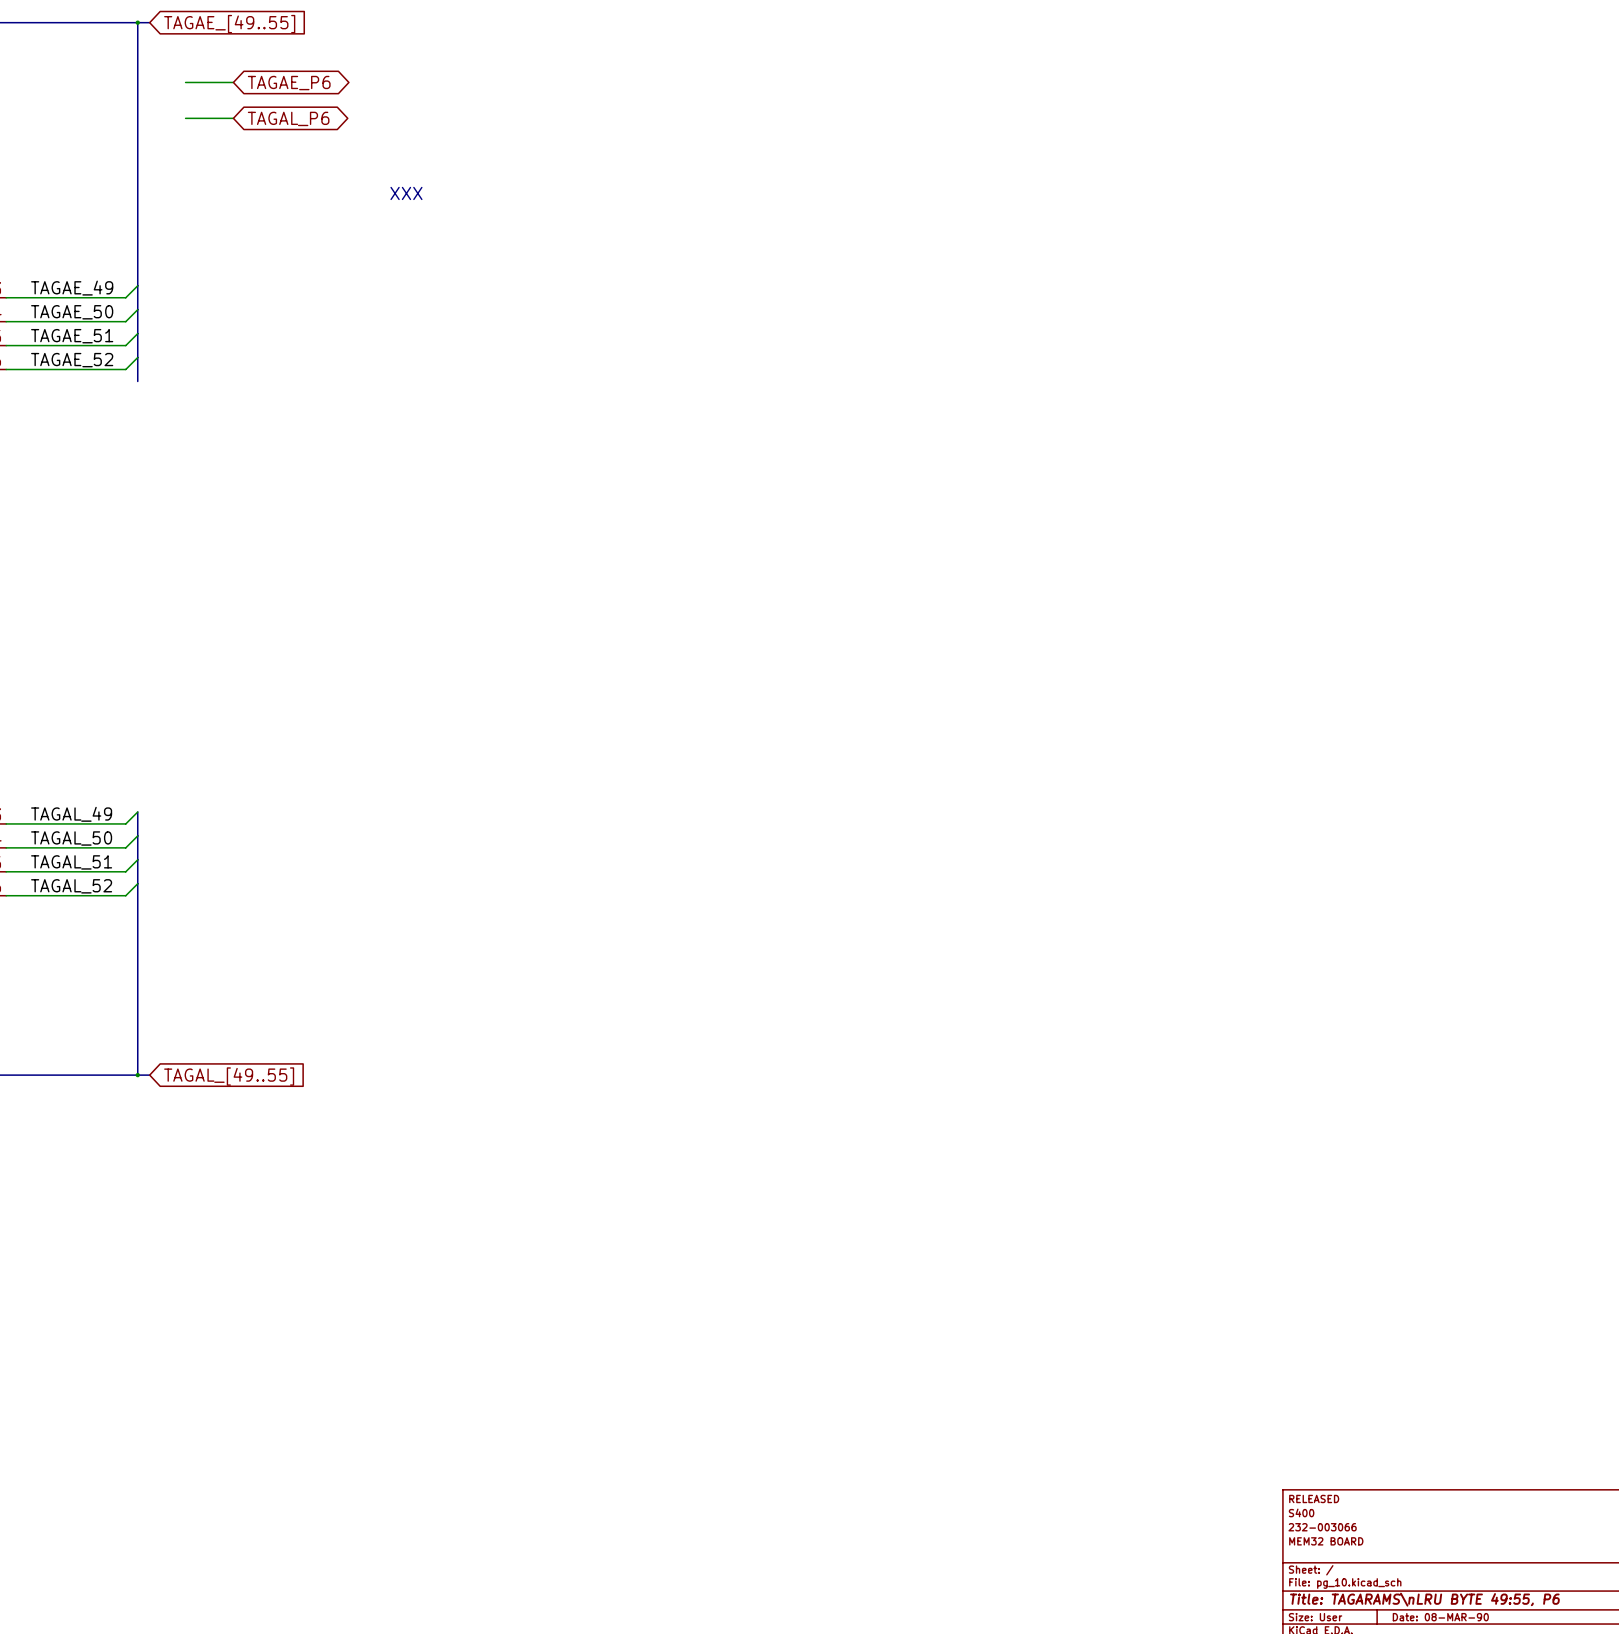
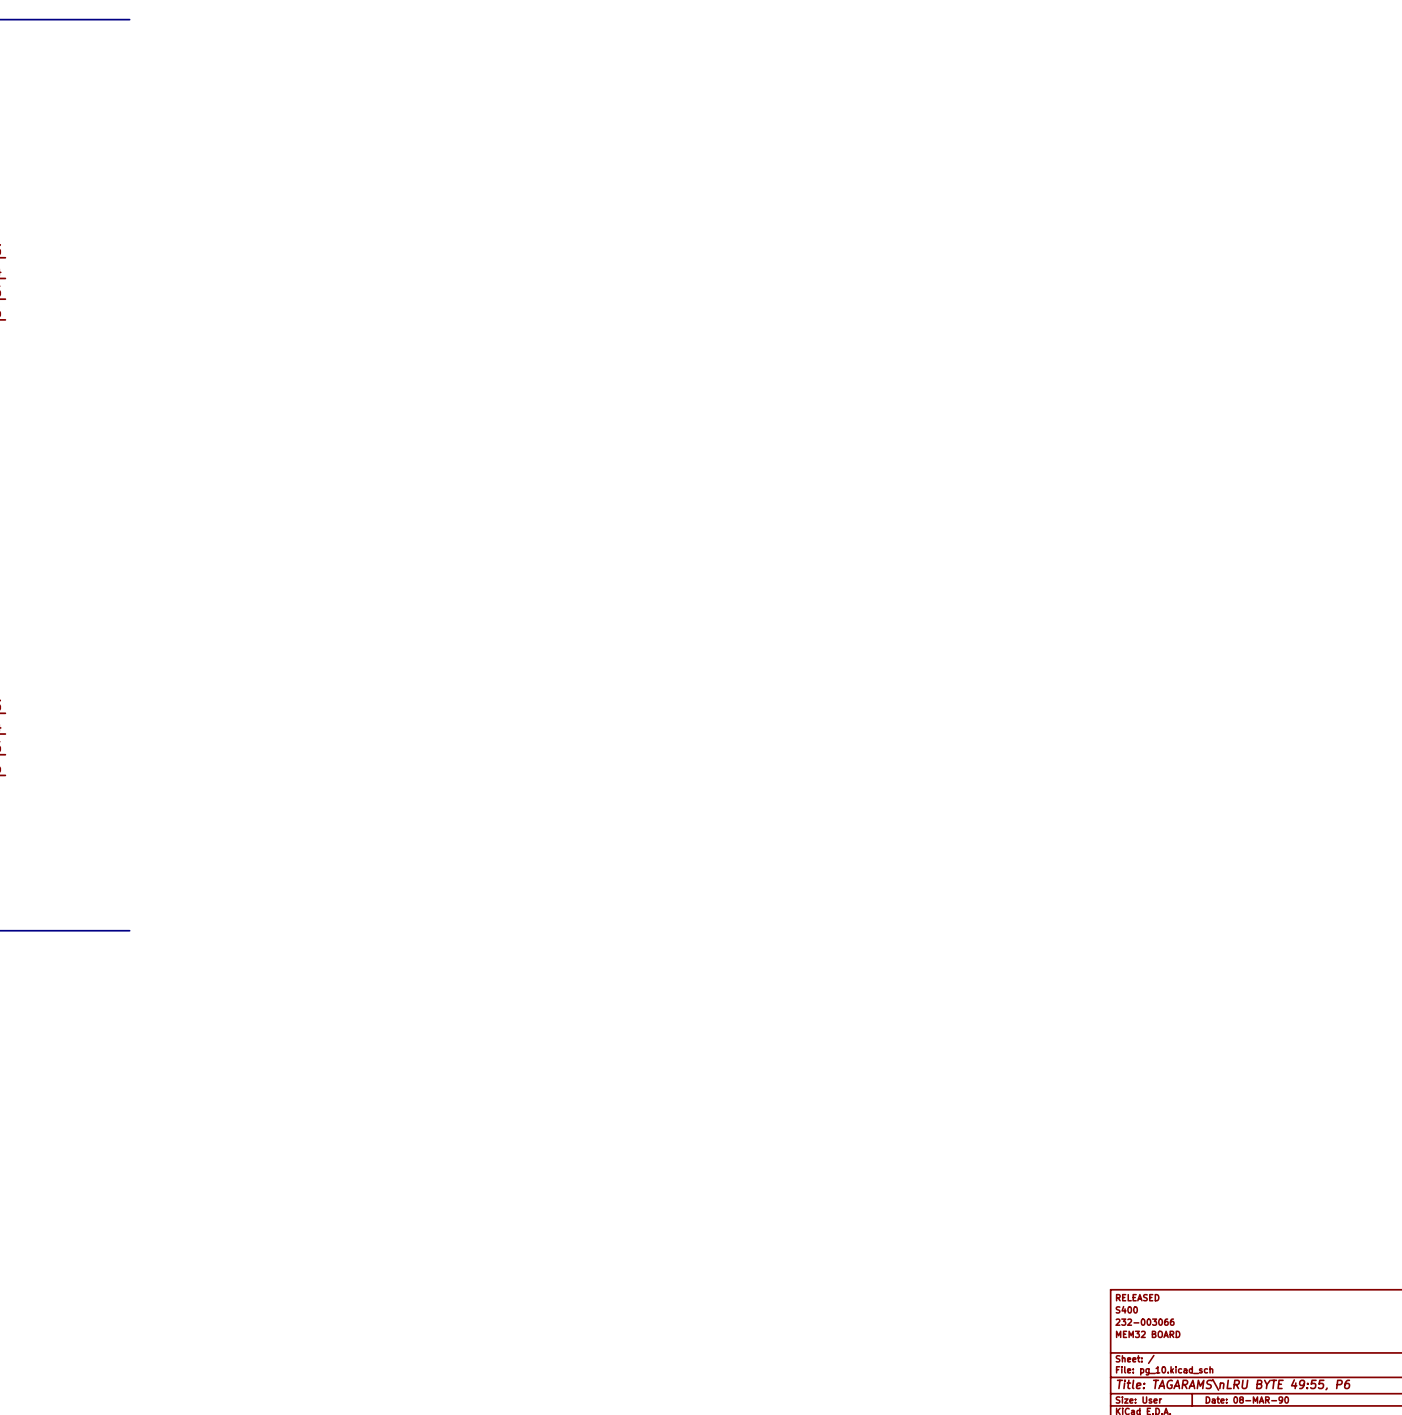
bus: (137, 22) (137, 381) -> none
junction: (137, 22) -> none
global label: TAGAE_[49..55] (229, 24) -> none
wire: (185, 82) (233, 82) -> none
global label: TAGAE_P6 (289, 83) -> none
wire: (185, 118) (233, 118) -> none
global label: TAGAL_P6 (288, 118) -> none
text: XXX (406, 193) -> none
wire: (137, 285) (125, 297) (6, 297) -> none
label: TAGAE_49 (72, 288) -> none
wire: (137, 309) (125, 321) (6, 321) -> none
label: TAGAE_50 (72, 312) -> none
wire: (137, 333) (125, 345) (6, 345) -> none
label: TAGAE_51 (72, 336) -> none
wire: (137, 357) (125, 369) (6, 369) -> none
label: TAGAE_52 (72, 360) -> none
bus: (137, 812) (137, 1075) -> none
wire: (137, 812) (125, 823) (6, 823) -> none
label: TAGAL_49 (71, 814) -> none
wire: (137, 835) (125, 847) (6, 847) -> none
label: TAGAL_50 (71, 838) -> none
wire: (137, 859) (125, 871) (6, 871) -> none
label: TAGAL_51 (71, 862) -> none
wire: (137, 883) (125, 895) (6, 895) -> none
label: TAGAL_52 (71, 886) -> none
junction: (137, 1075) -> none
global label: TAGAL_[49..55] (229, 1076) -> none

